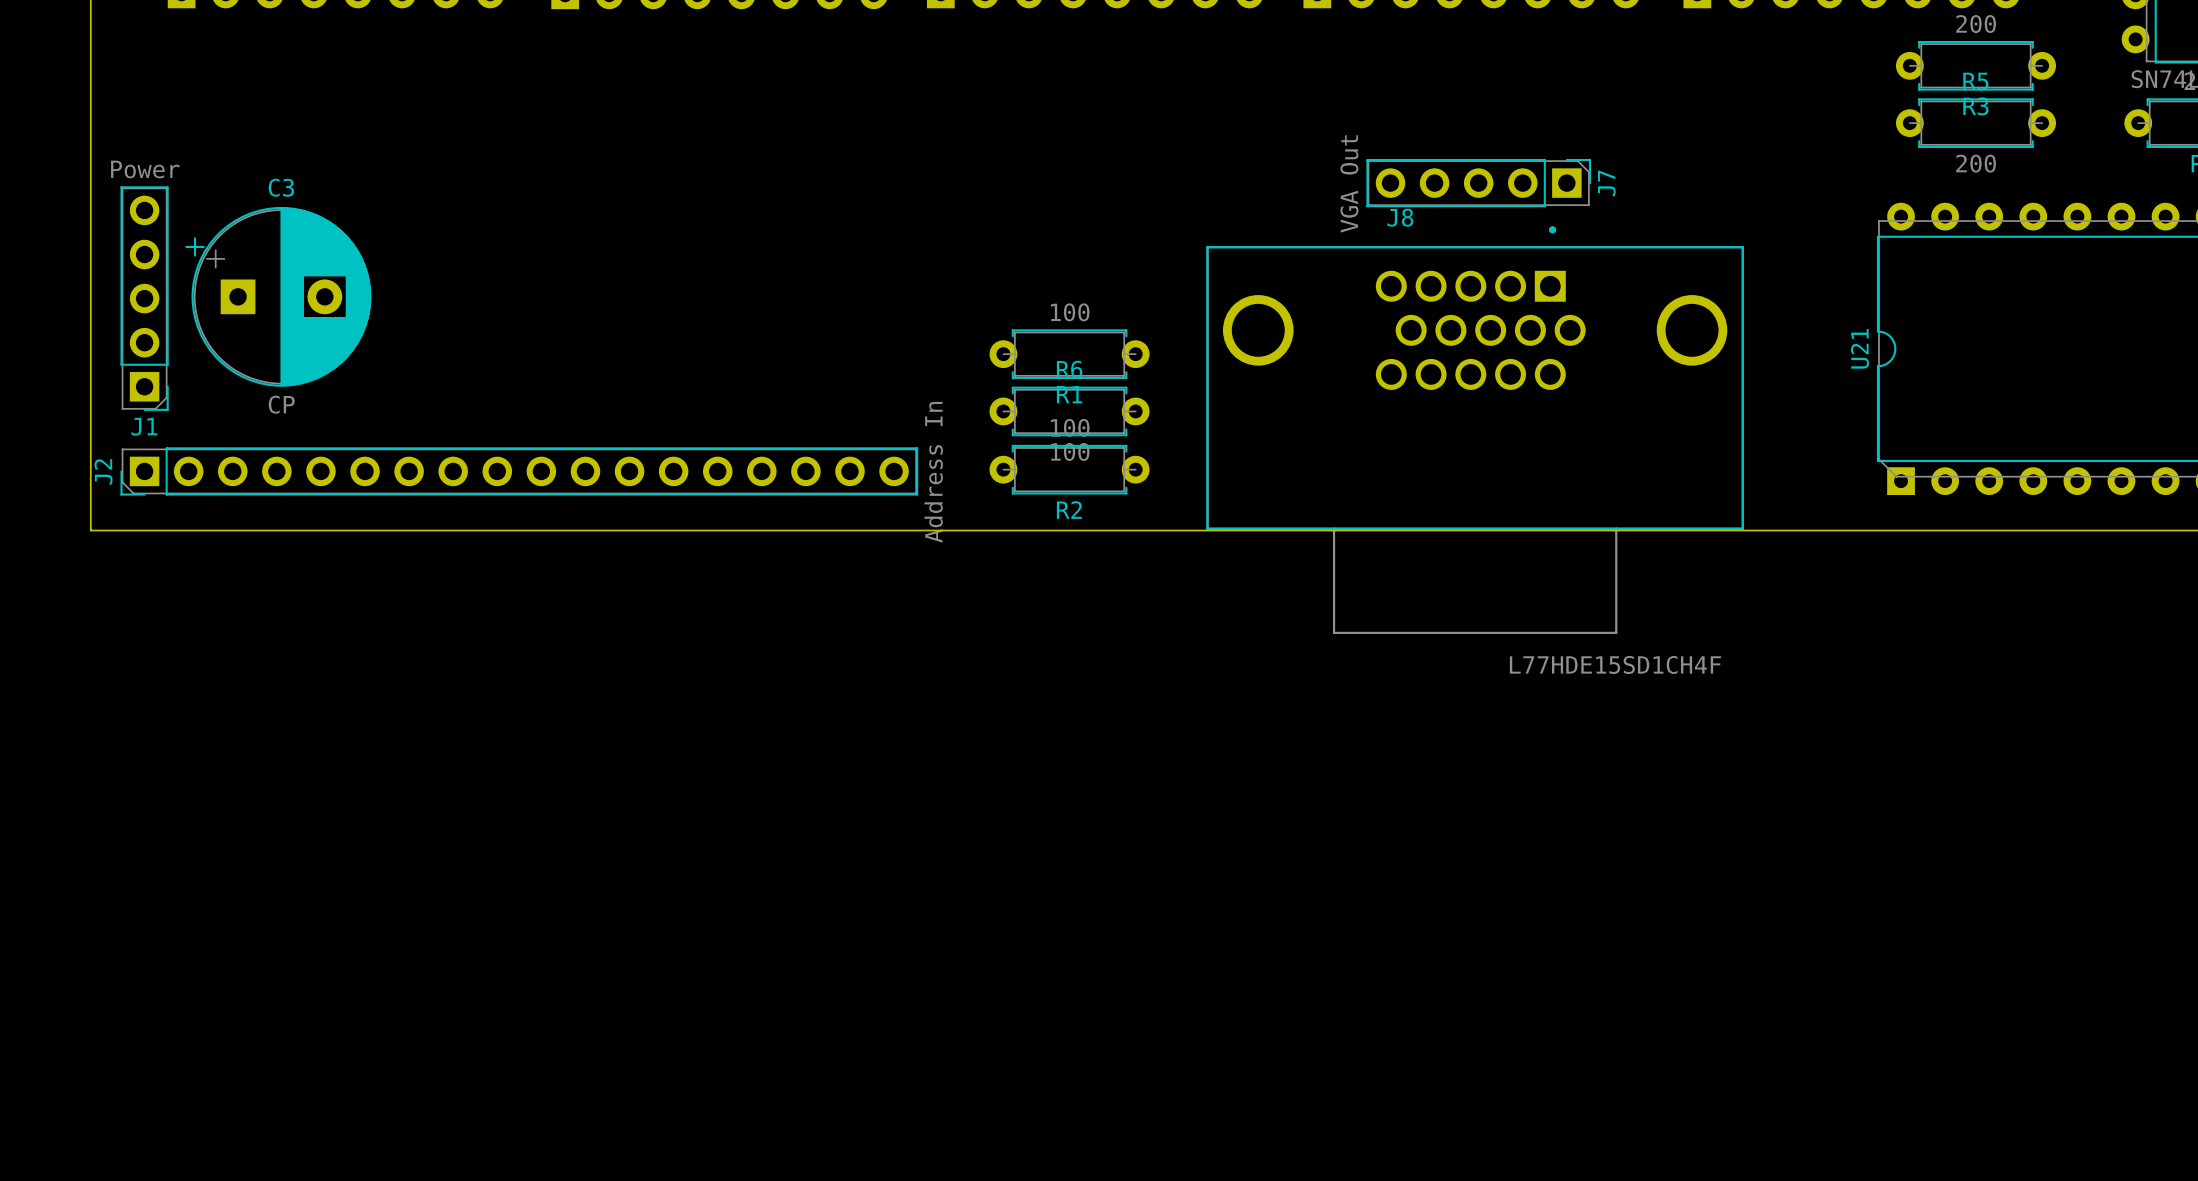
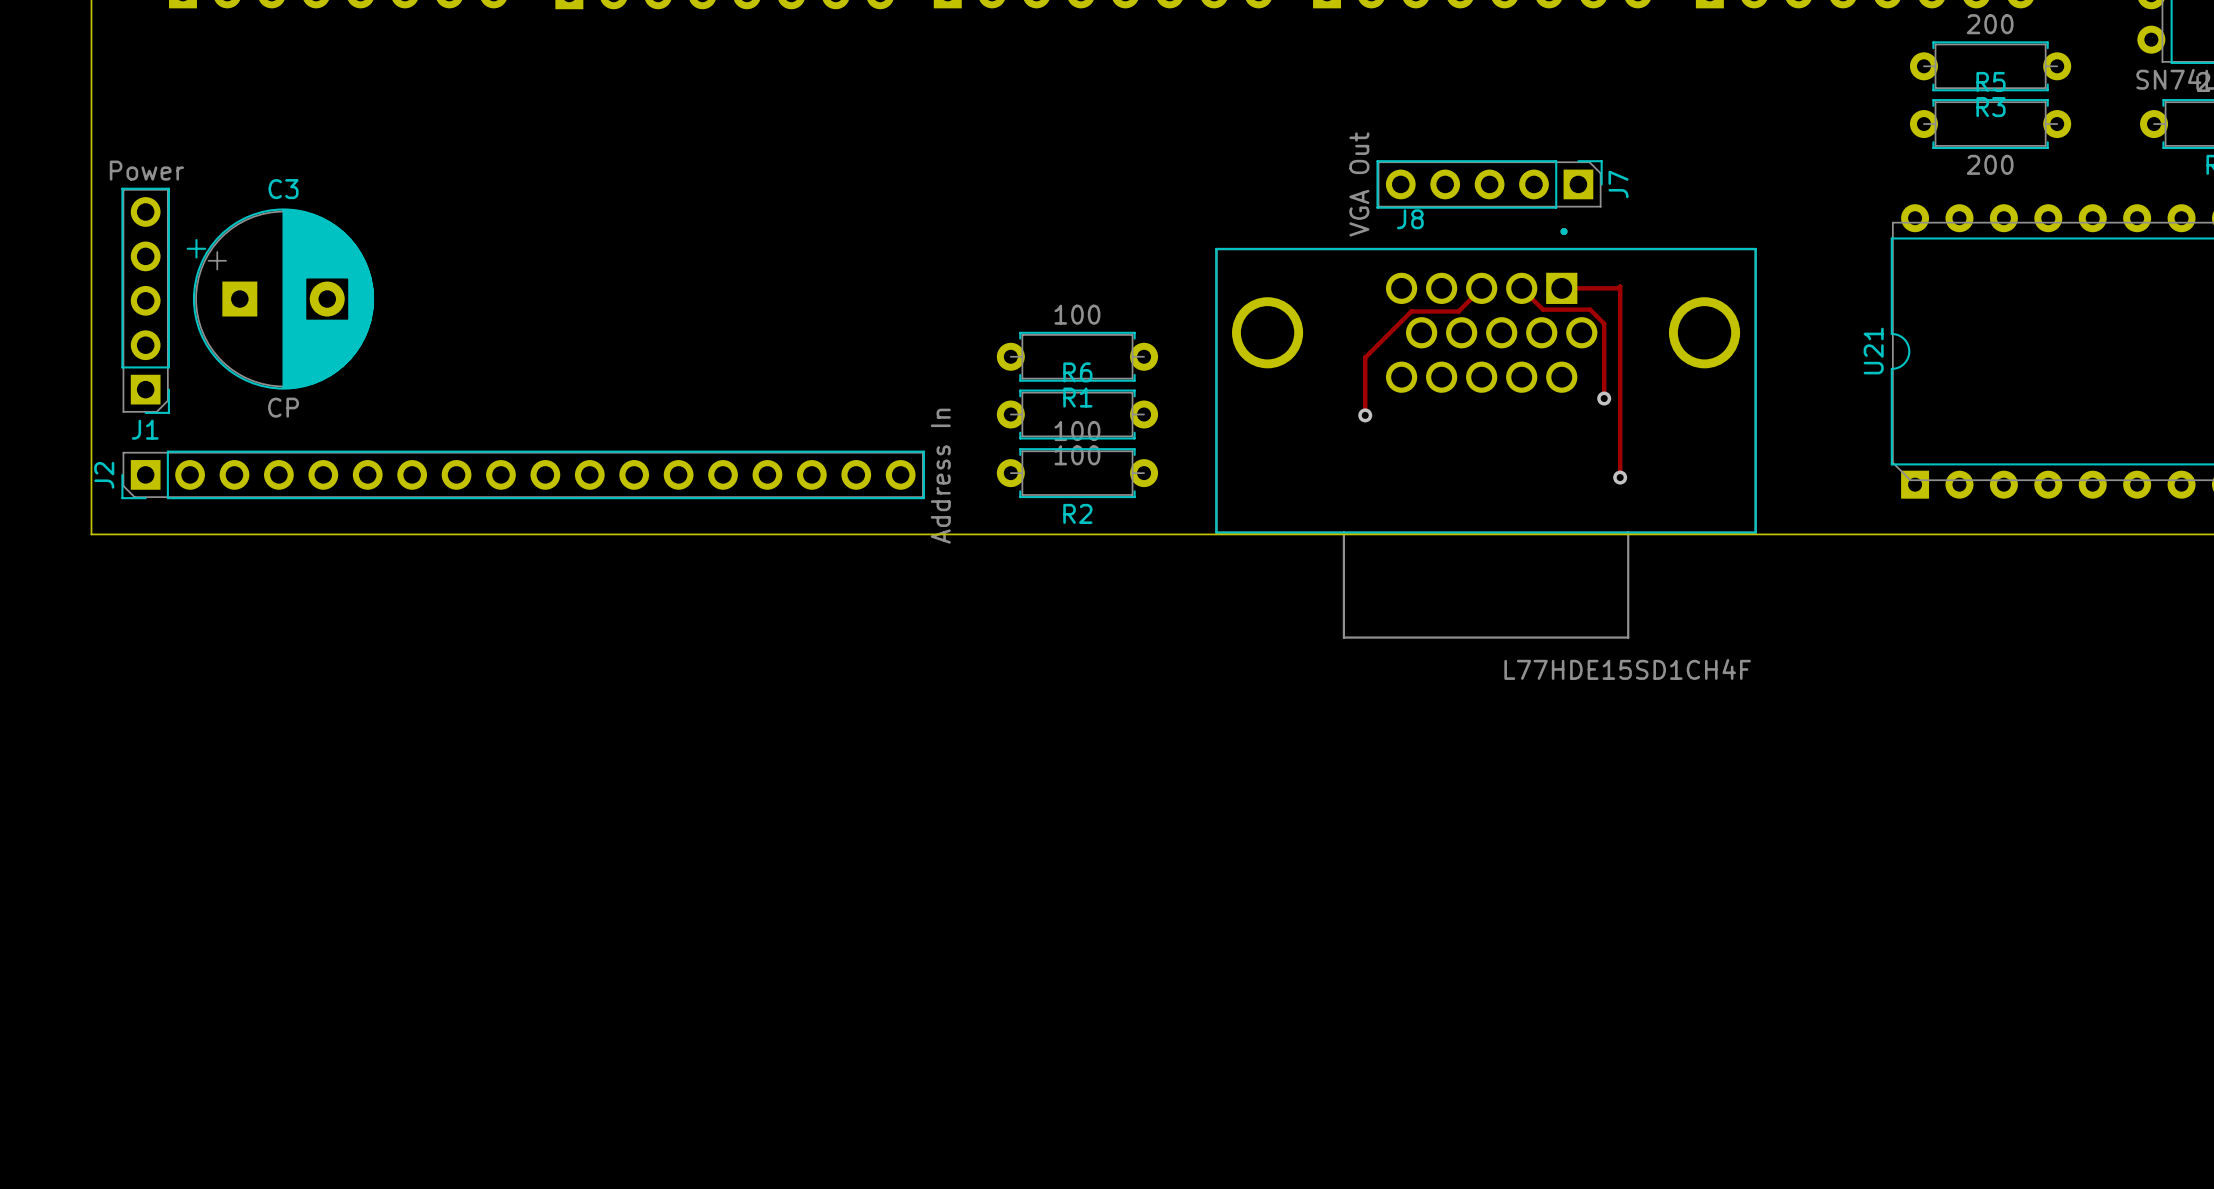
track: none -> (1481, 288) (1458, 311) (1411, 311) (1365, 357) (1365, 415)
track: none -> (1521, 288) (1543, 309) (1590, 309) (1604, 323) (1604, 398)
track: none -> (1561, 288) (1618, 288) (1620, 286) (1620, 477)
via: none -> (1604, 398)
via: none -> (1365, 415)
via: none -> (1620, 477)

